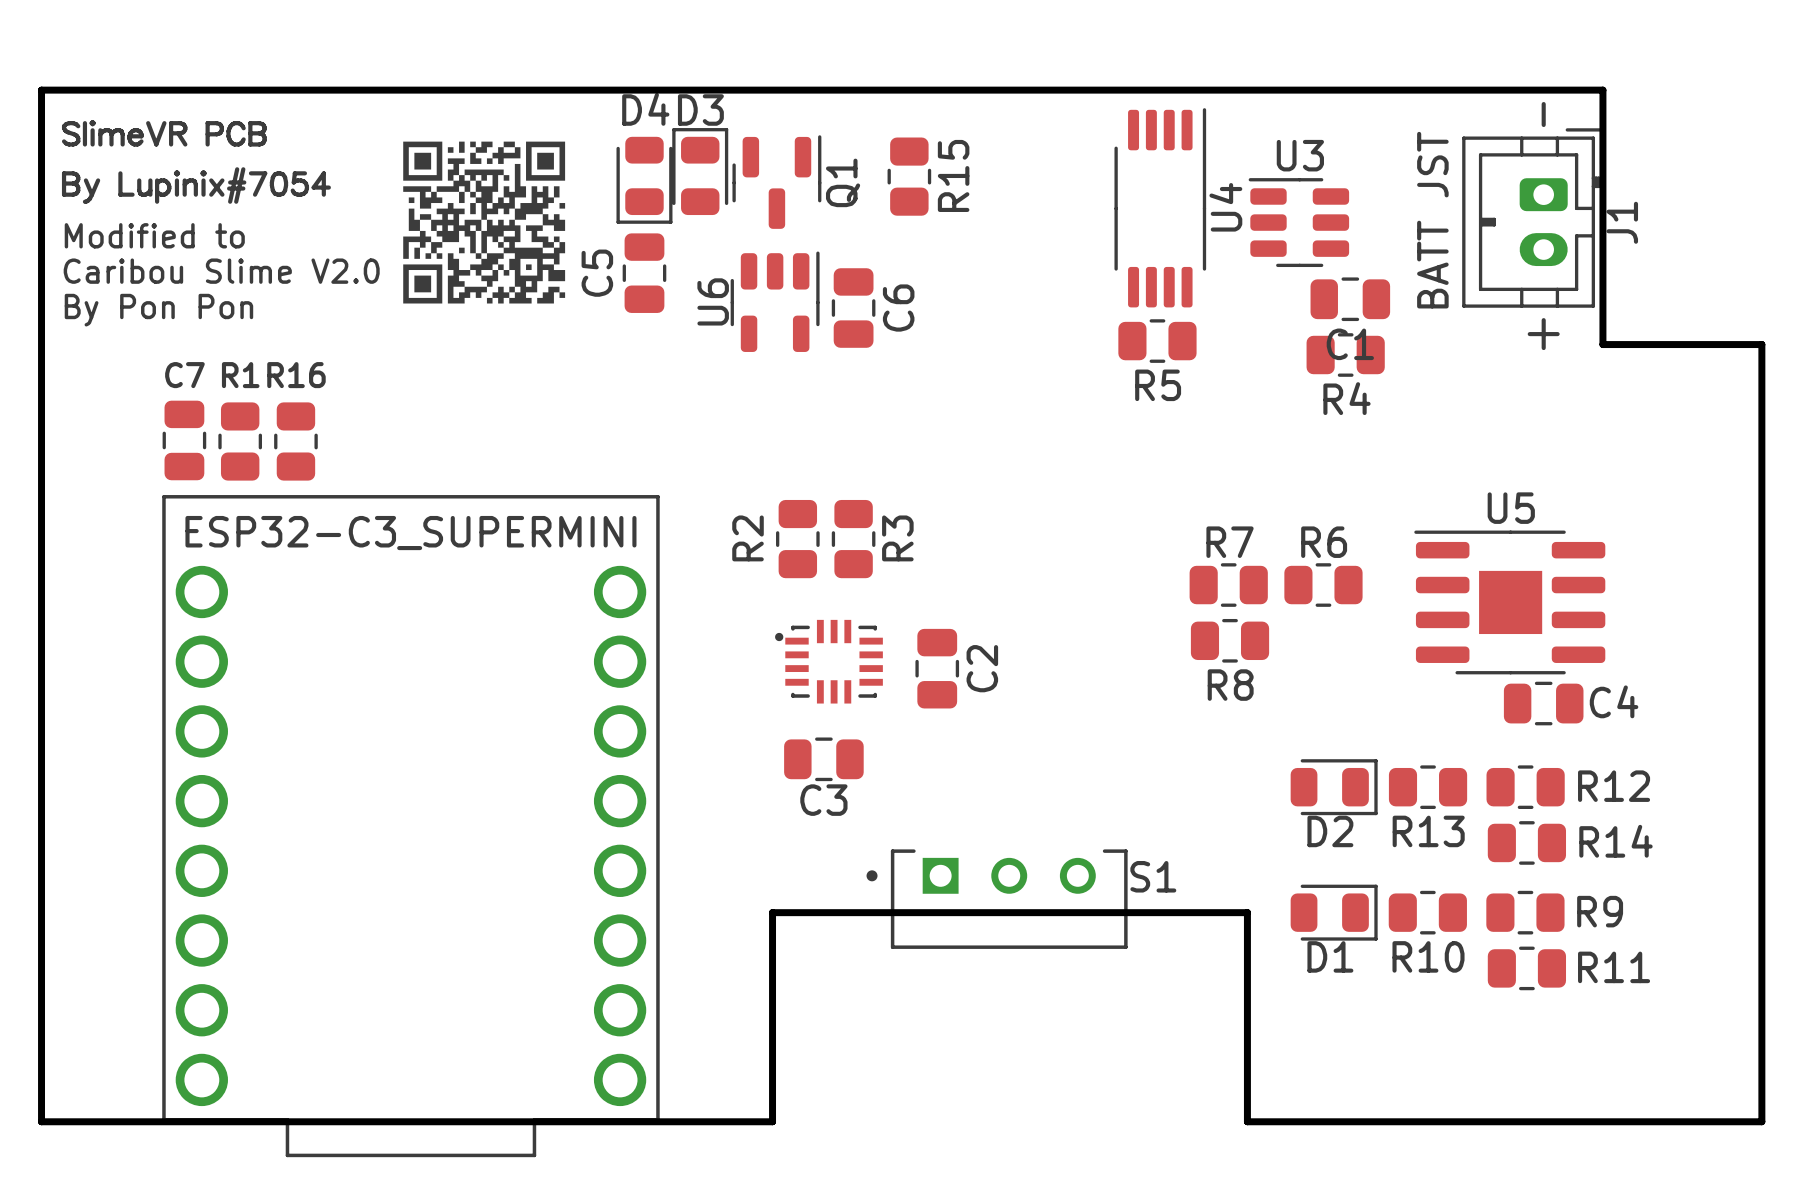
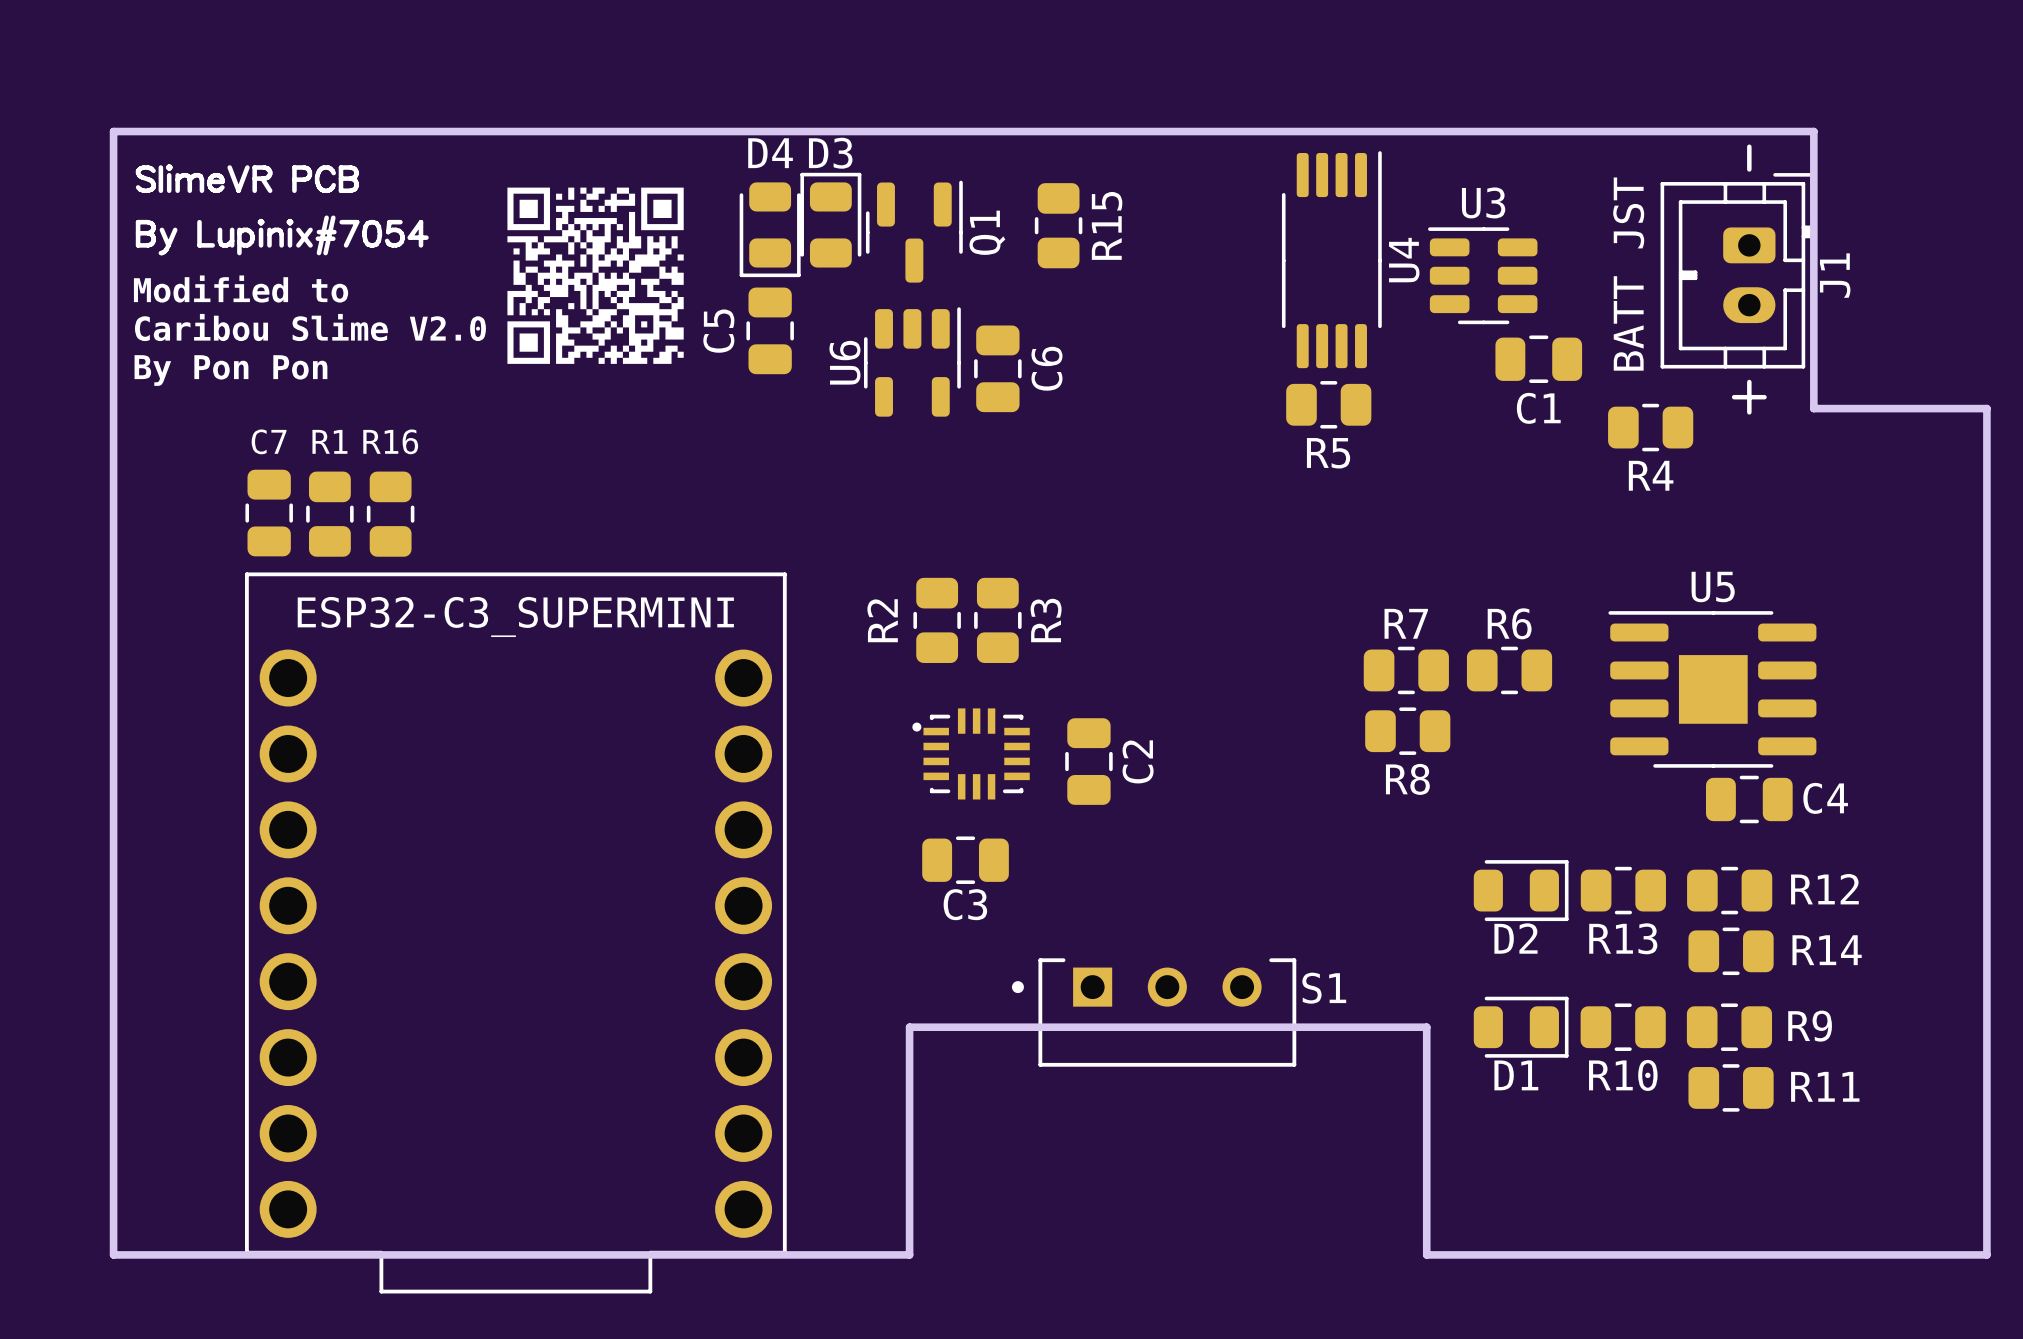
R4 position: (1345, 355) -> (1650, 427)

